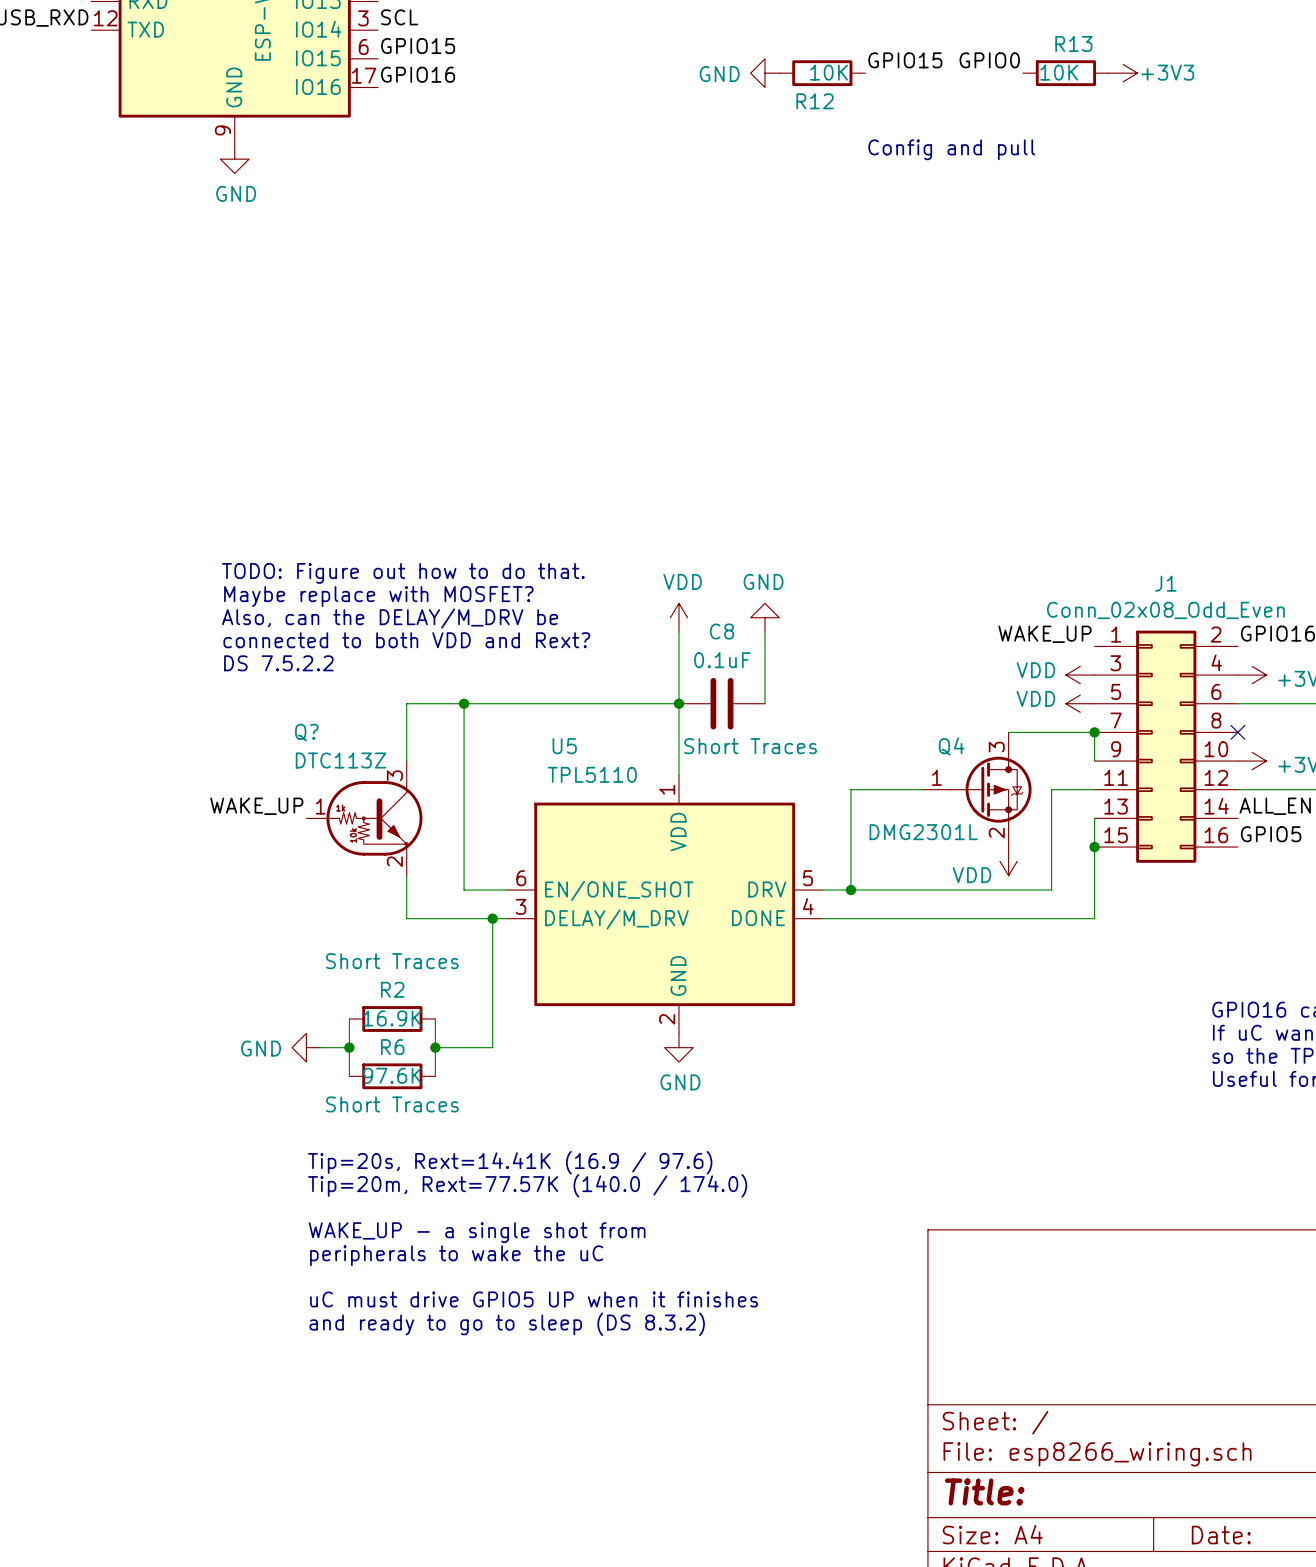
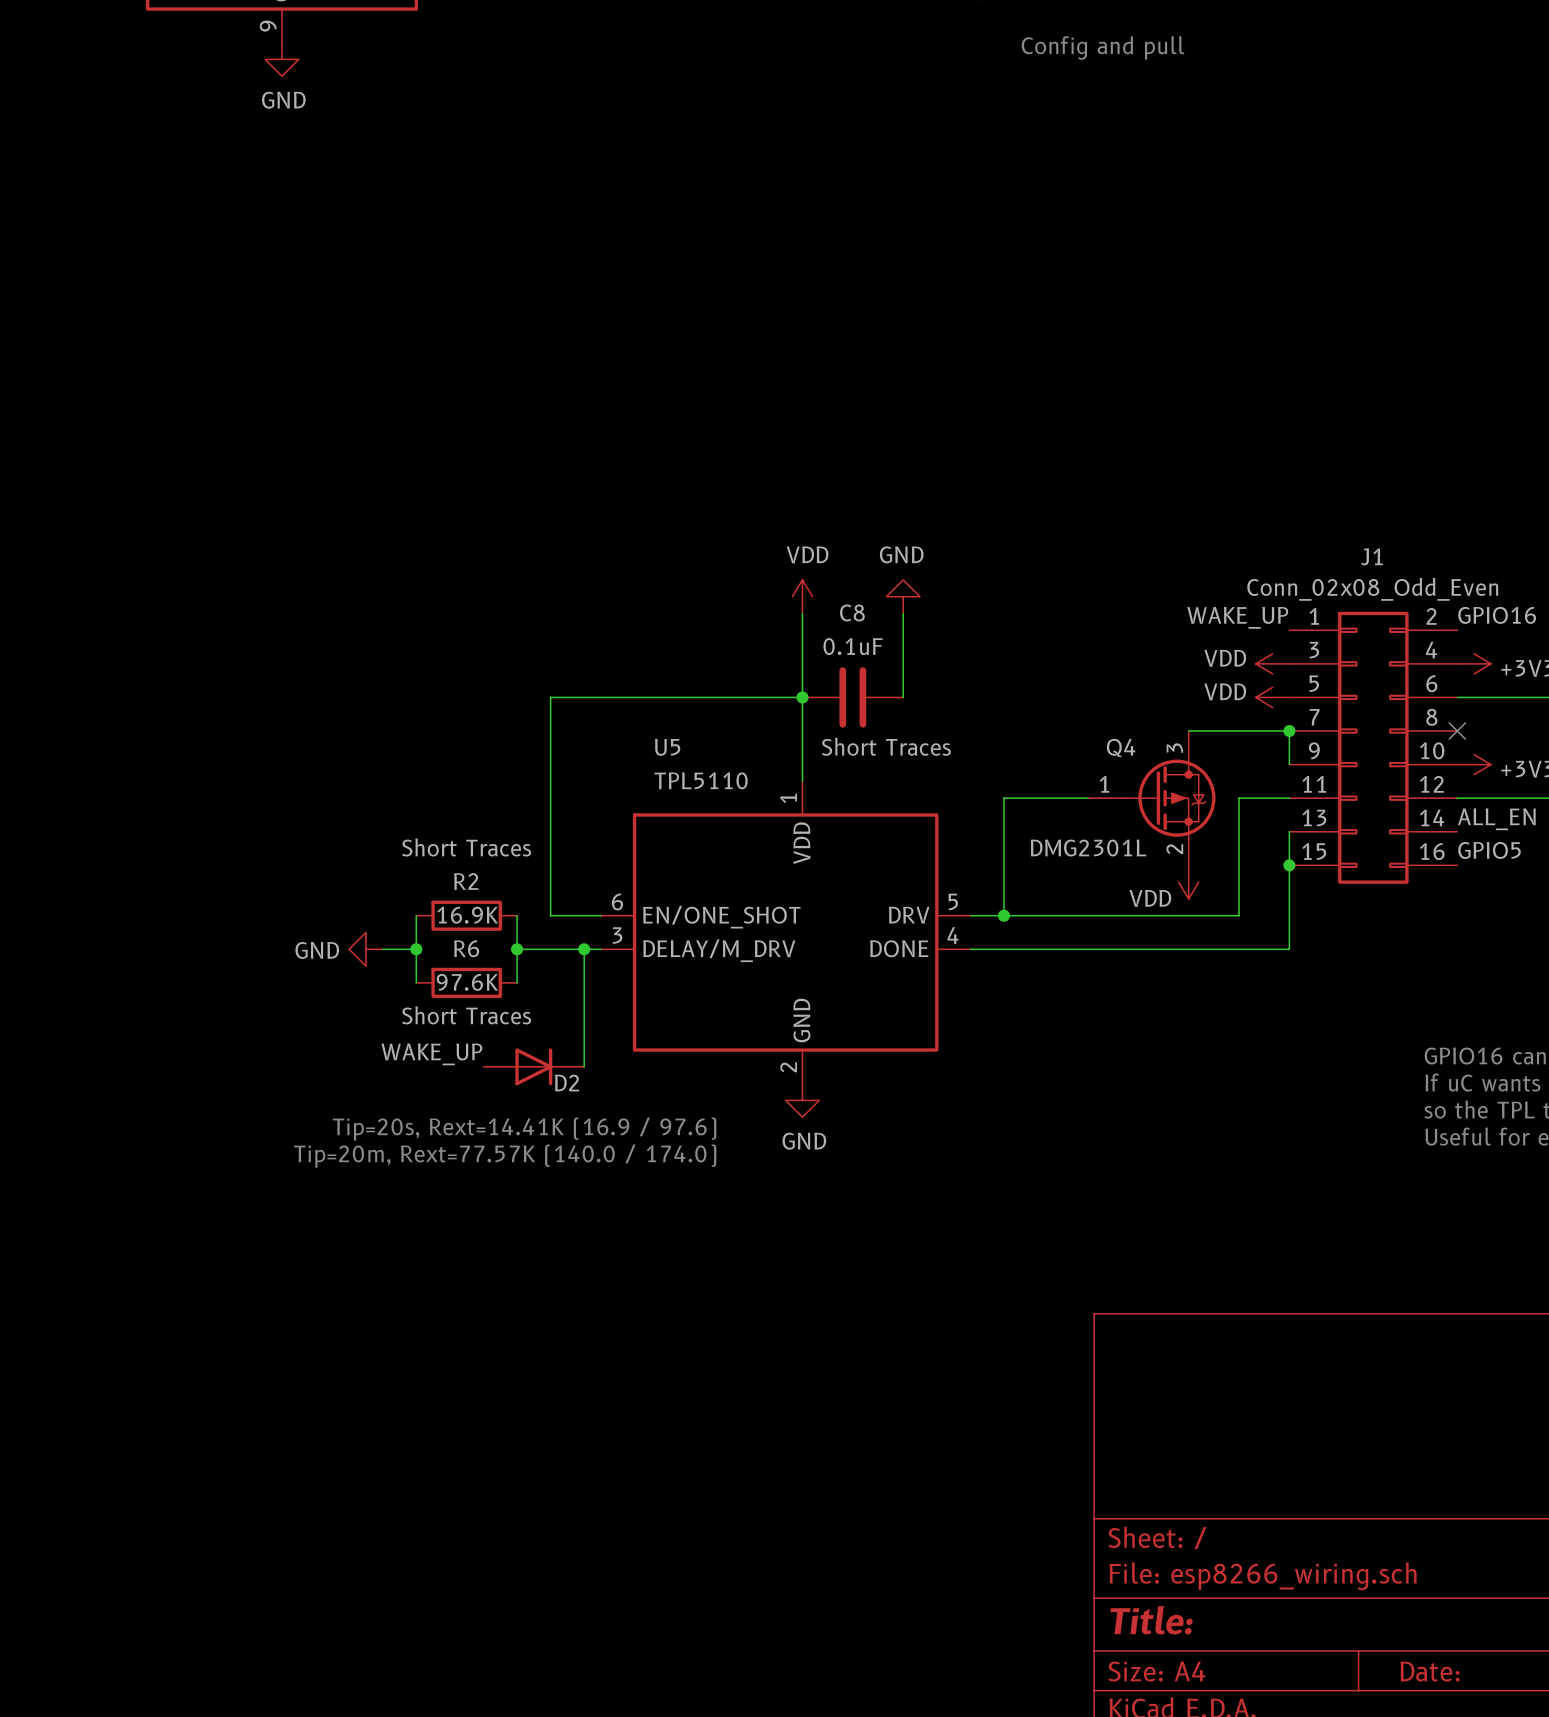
text: TODO: Figure out how to do that. (403, 573) -> none
text: Maybe replace with MOSFET? (378, 596) -> none
text: Also, can the DELAY/M_DRV be (390, 618) -> none
text: connected to both VDD and Rext? (406, 640) -> none
text: DS 7.5.2.2 (278, 663) -> none
wire: (464, 703) (406, 703) (406, 761) -> none
junction: (464, 703) -> none
label position: WAKE_UP (256, 806) -> WAKE_UP (431, 1054)
Q?: DTC113Z (364, 818) -> none
wire: (406, 875) (406, 918) (435, 918) -> none
junction: none -> (416, 949)
junction: none -> (517, 949)
wire: (349, 1019) (349, 1076) -> (416, 915) (416, 982)
R2 position: (392, 1019) -> (466, 915)
wire: (435, 1019) (435, 1076) -> (517, 915) (517, 982)
D2: none -> (533, 1066)
wire: (492, 1019) (492, 1047) (435, 1047) -> none
power symbol position: GND (306, 1047) -> GND (365, 949)
wire: (320, 1047) (349, 1047) -> (382, 949) (416, 949)
junction: (349, 1047) -> none
junction: (435, 1047) -> none
text: none -> Tip=20s, Rext=14.41K (16.9 / 97.6) (524, 1129)
R6 position: (392, 1076) -> (466, 982)
text: none -> Tip=20m, Rext=77.57K (140.0 / 174.0) (505, 1156)
text: Tip=20s, Rext=14.41K (16.9 / 97.6) (510, 1162) -> none
text: Tip=20m, Rext=77.57K (140.0 / 174.0) (527, 1185) -> none
text: WAKE_UP - a single shot from (477, 1232) -> none
text: peripherals to wake the uC (456, 1255) -> none
text: uC must drive GPIO5 UP when it finishes (534, 1299) -> none
text: and ready to go to sleep (DS 8.3.2) (507, 1324) -> none

